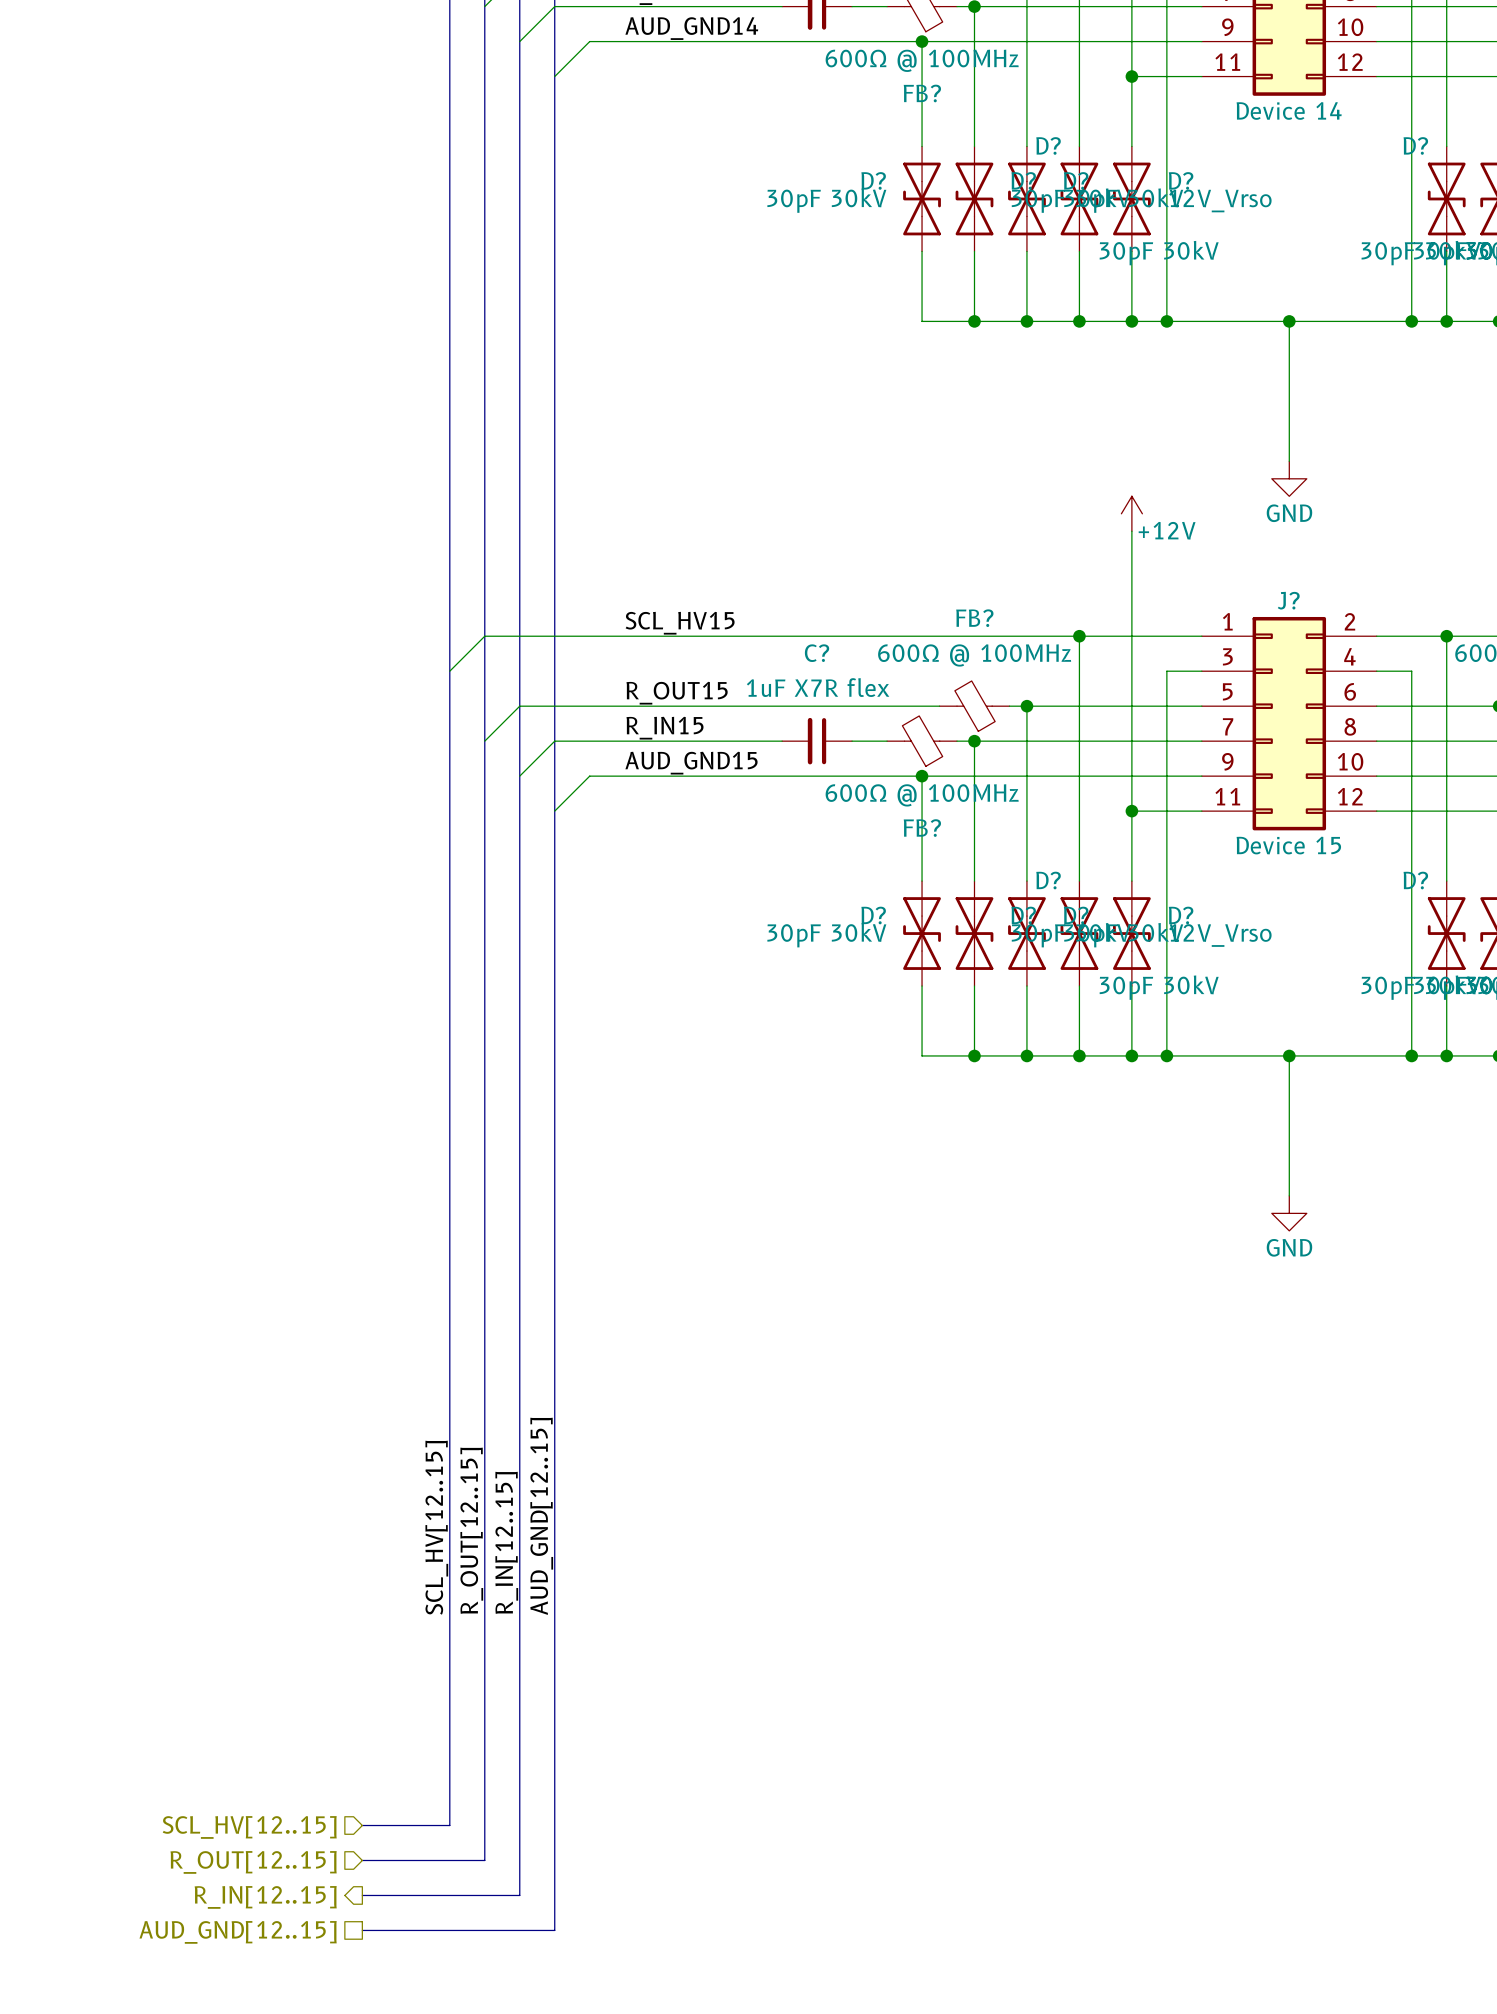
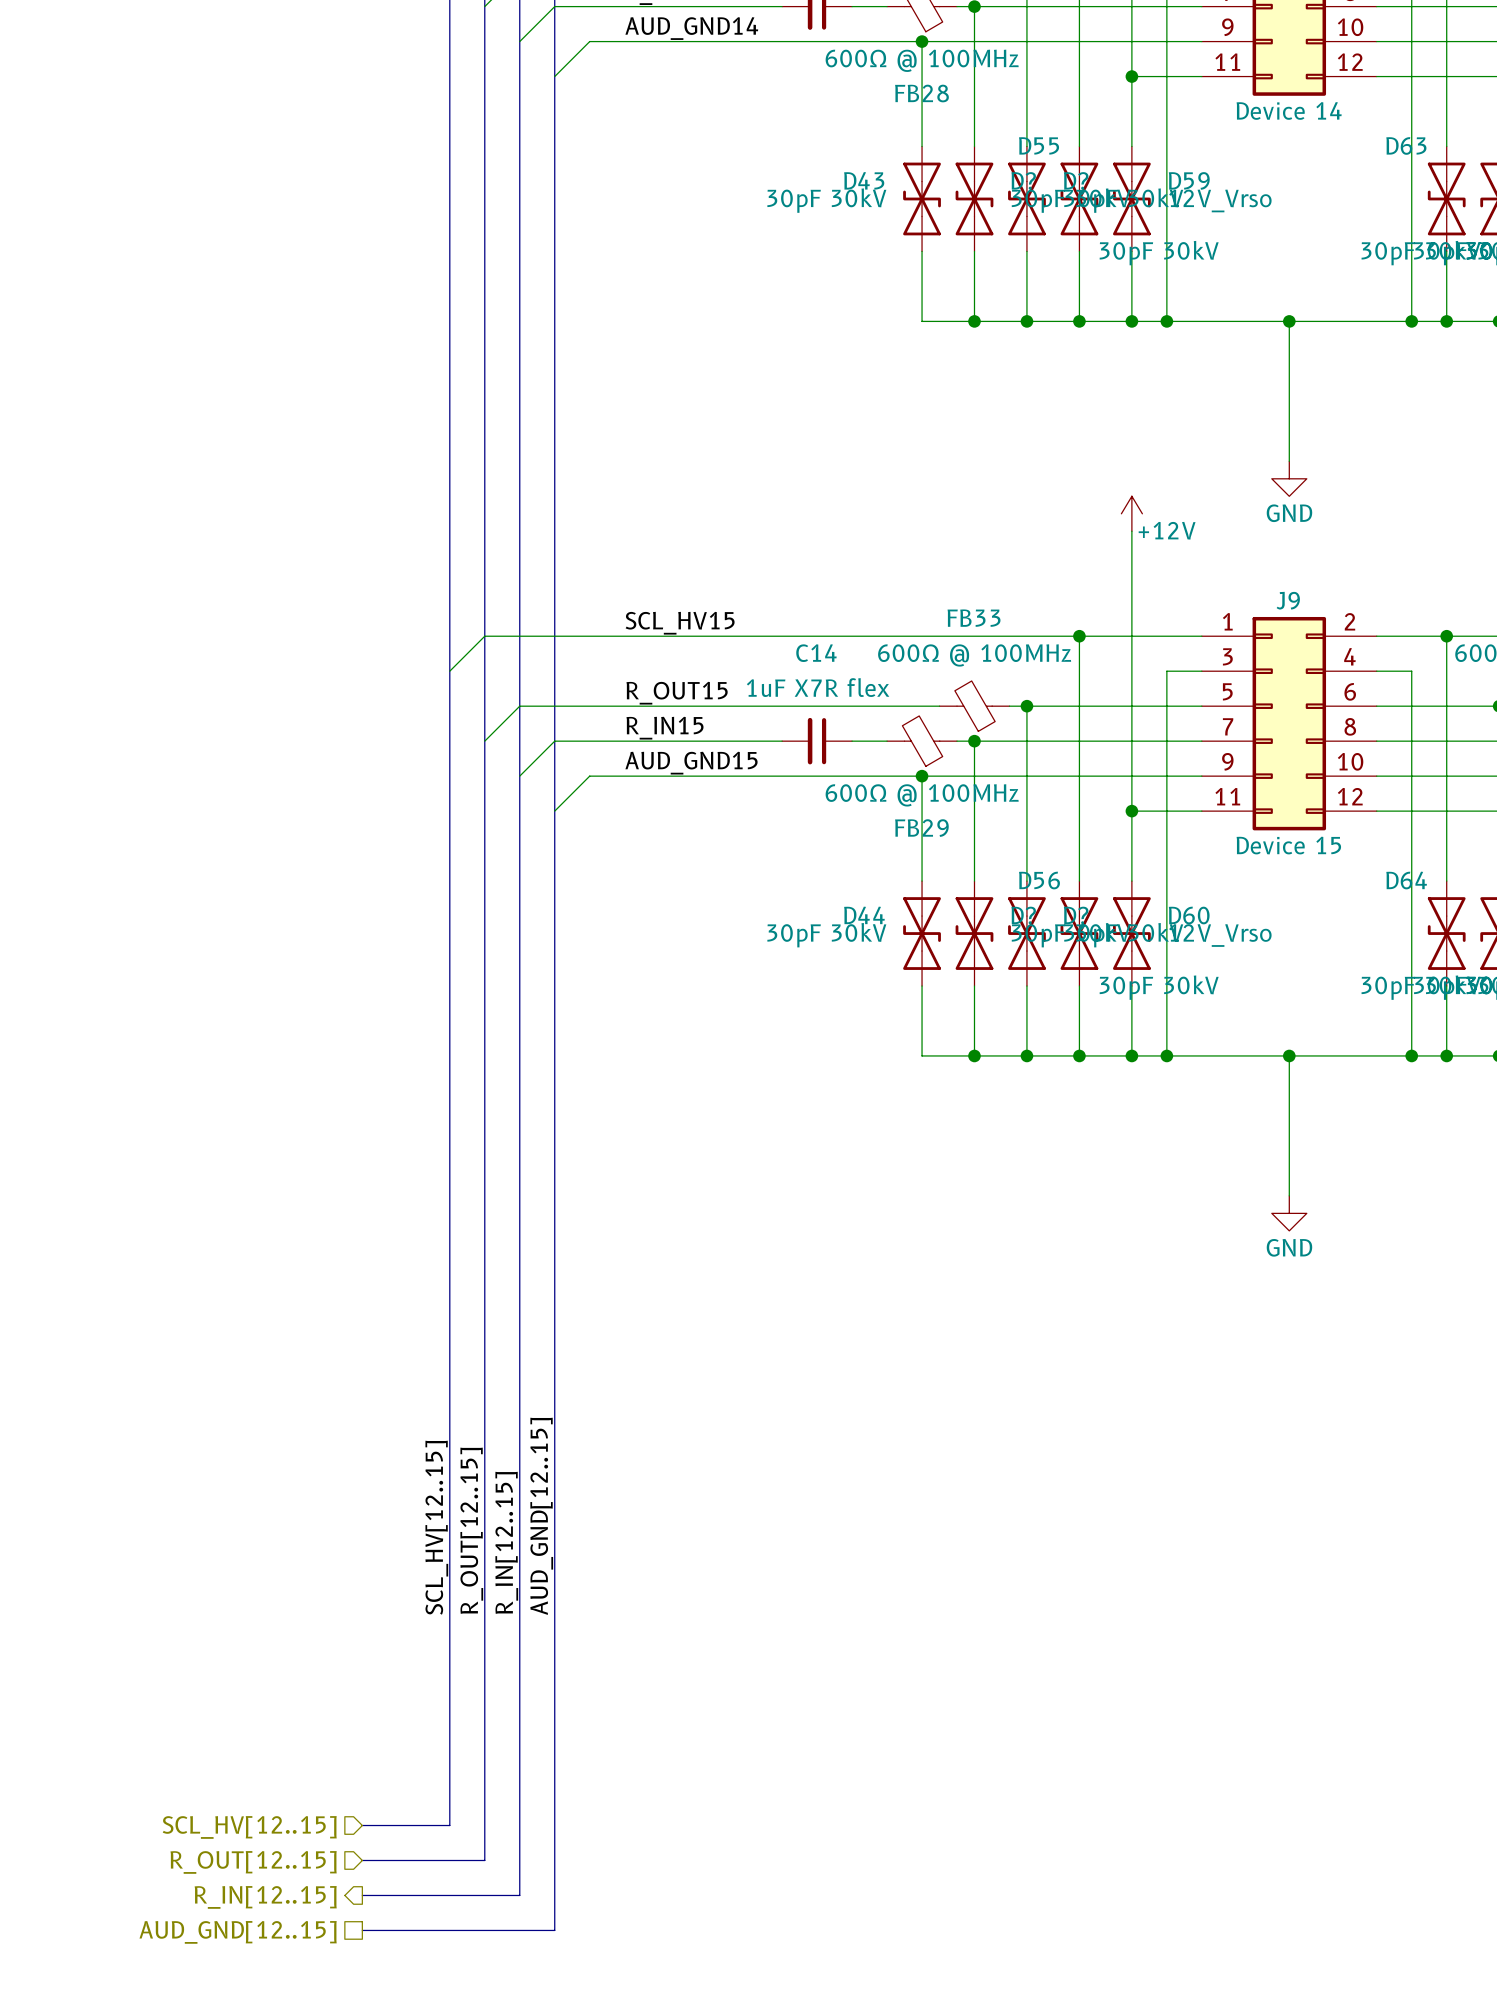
FB? name: FB? (922, 93) -> FB28 (921, 93)
D? name: D? (1048, 145) -> D55 (1039, 145)
D? name: D? (1415, 145) -> D63 (1406, 145)
D? name: D? (873, 180) -> D43 (864, 180)
D? name: D? (1181, 180) -> D59 (1189, 180)
J? name: J? (1288, 600) -> J9 (1288, 600)
FB? name: FB? (974, 618) -> FB33 (974, 618)
C? name: C? (817, 653) -> C14 (816, 653)
FB? name: FB? (922, 828) -> FB29 (921, 828)
D? name: D? (1048, 880) -> D56 (1039, 880)
D? name: D? (1415, 880) -> D64 (1406, 880)
D? name: D? (873, 915) -> D44 (864, 915)
D? name: D? (1181, 915) -> D60 (1189, 915)

